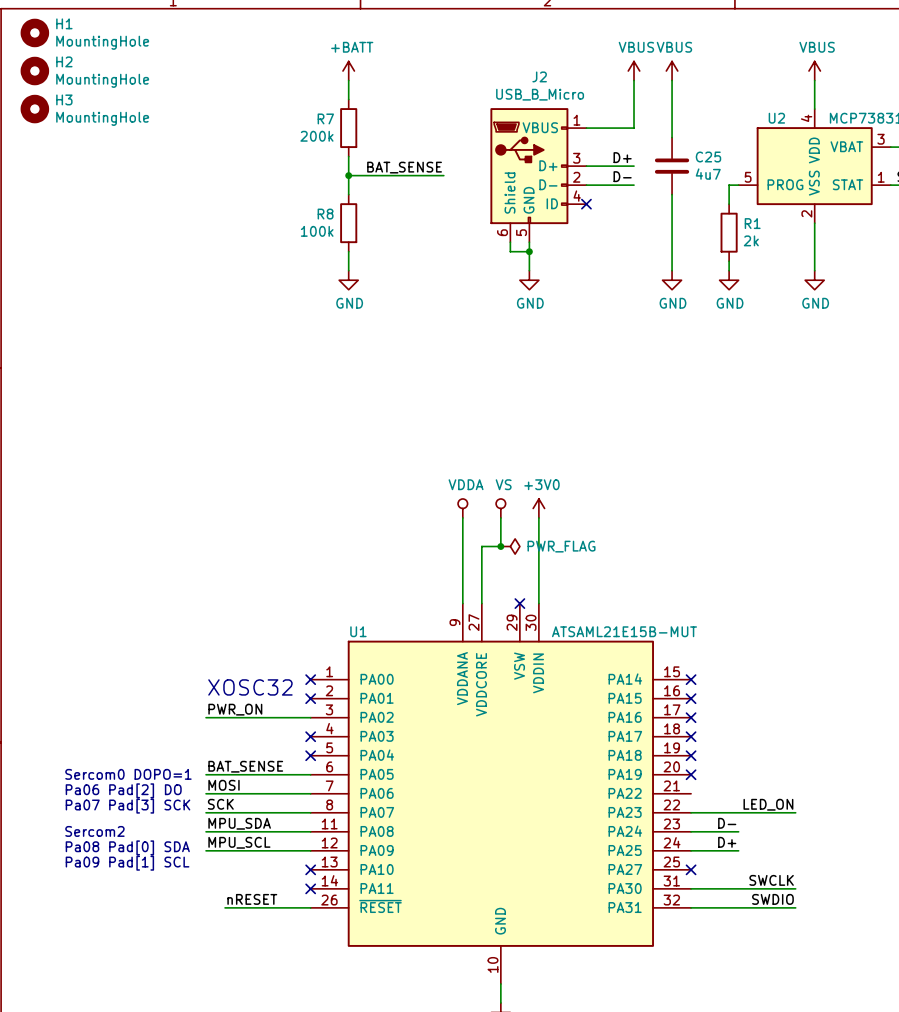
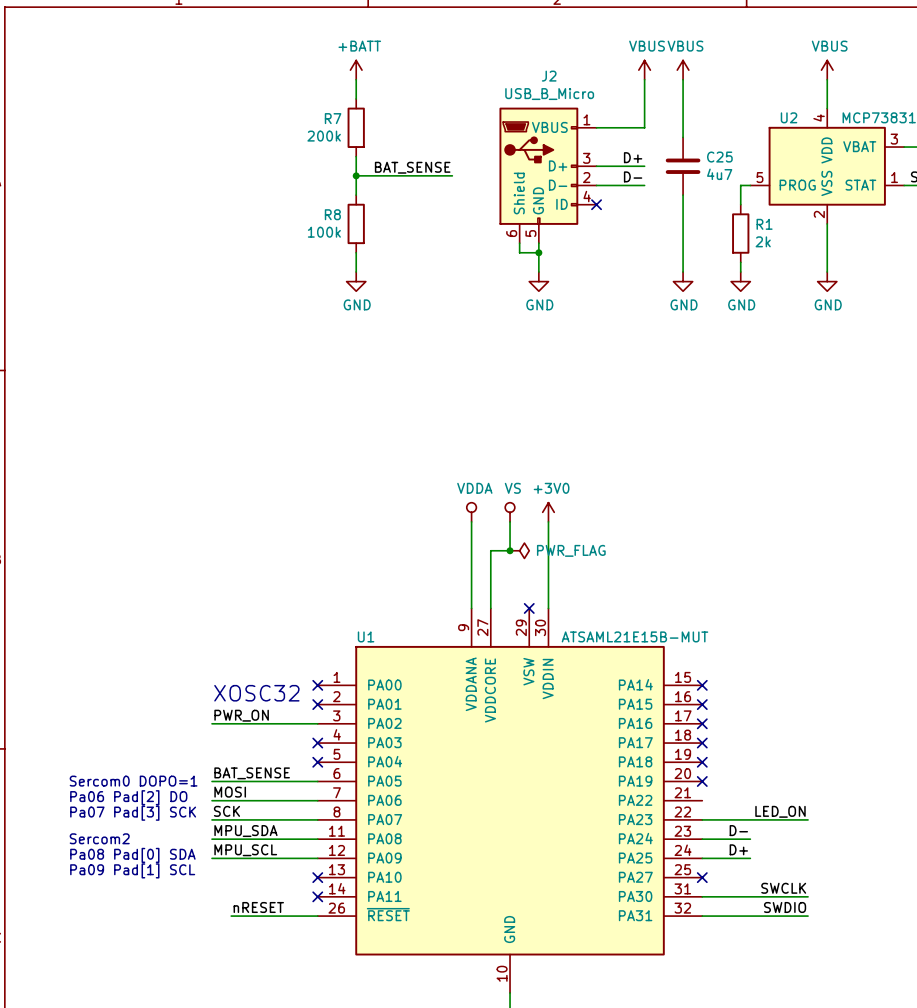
H1: MountingHole (34, 32) -> none
H2: MountingHole (34, 71) -> none
H3: MountingHole (34, 109) -> none

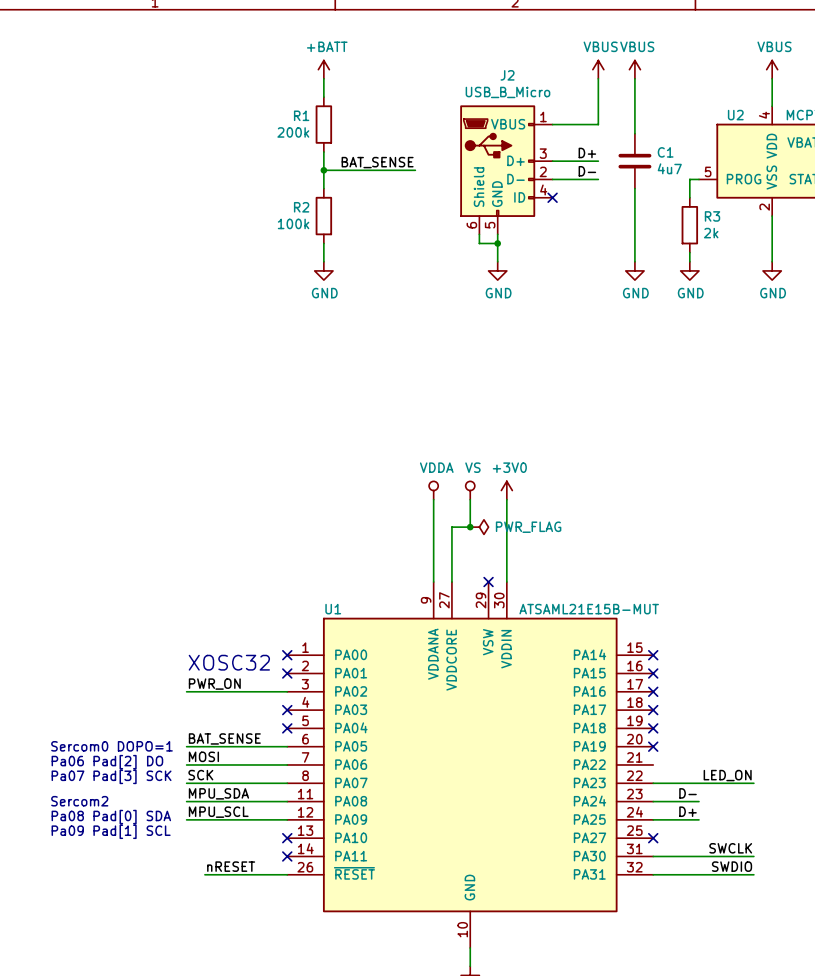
R7 name: R7 (333, 118) -> R1 (301, 115)
C25 name: C25 (719, 157) -> C1 (665, 152)
R8 name: R8 (332, 214) -> R2 (301, 207)
R1 name: R1 (764, 224) -> R3 (712, 216)

